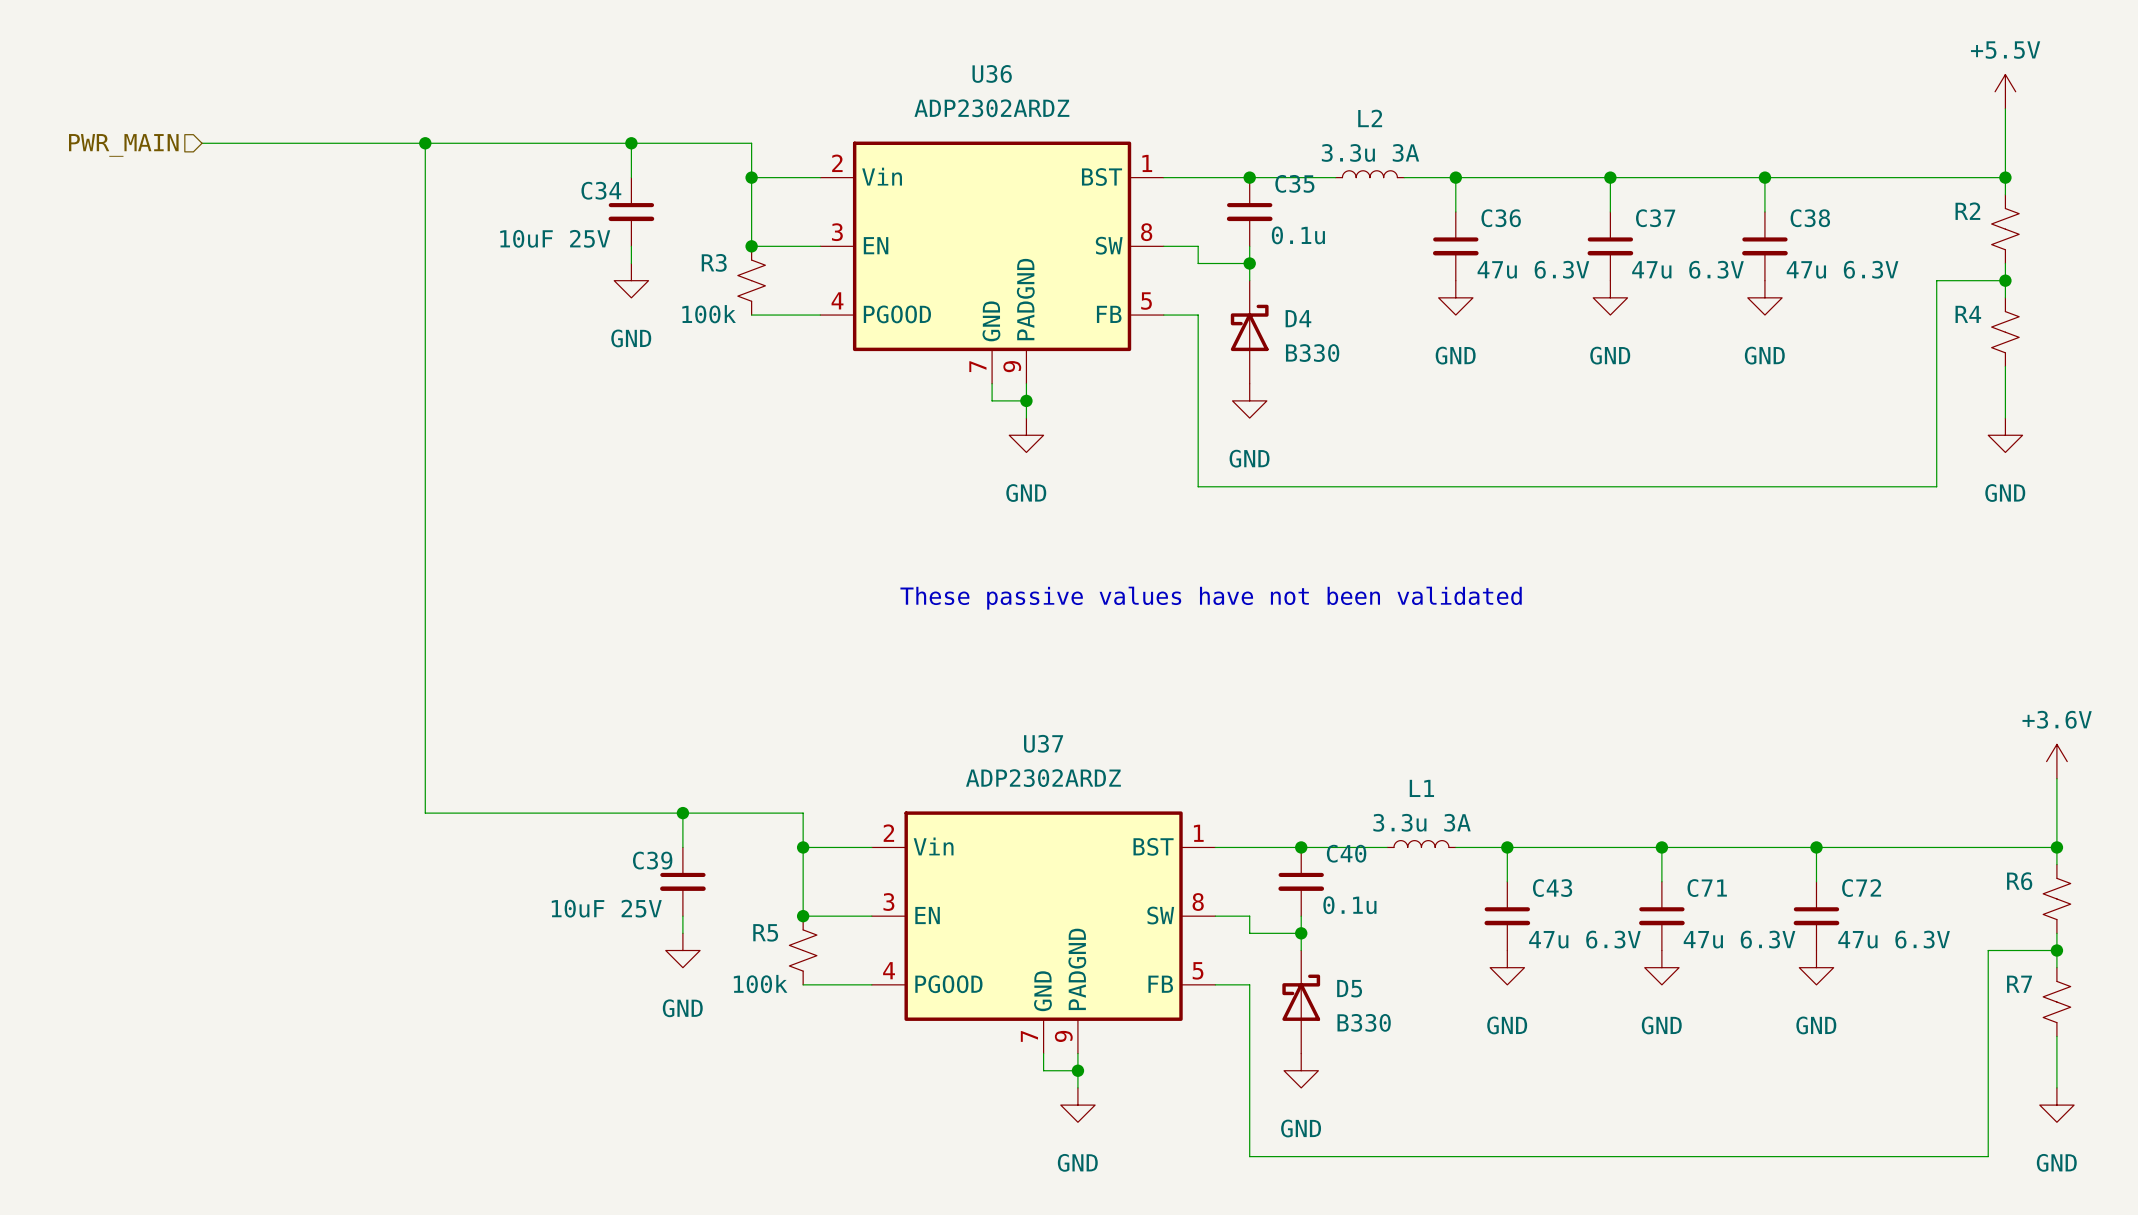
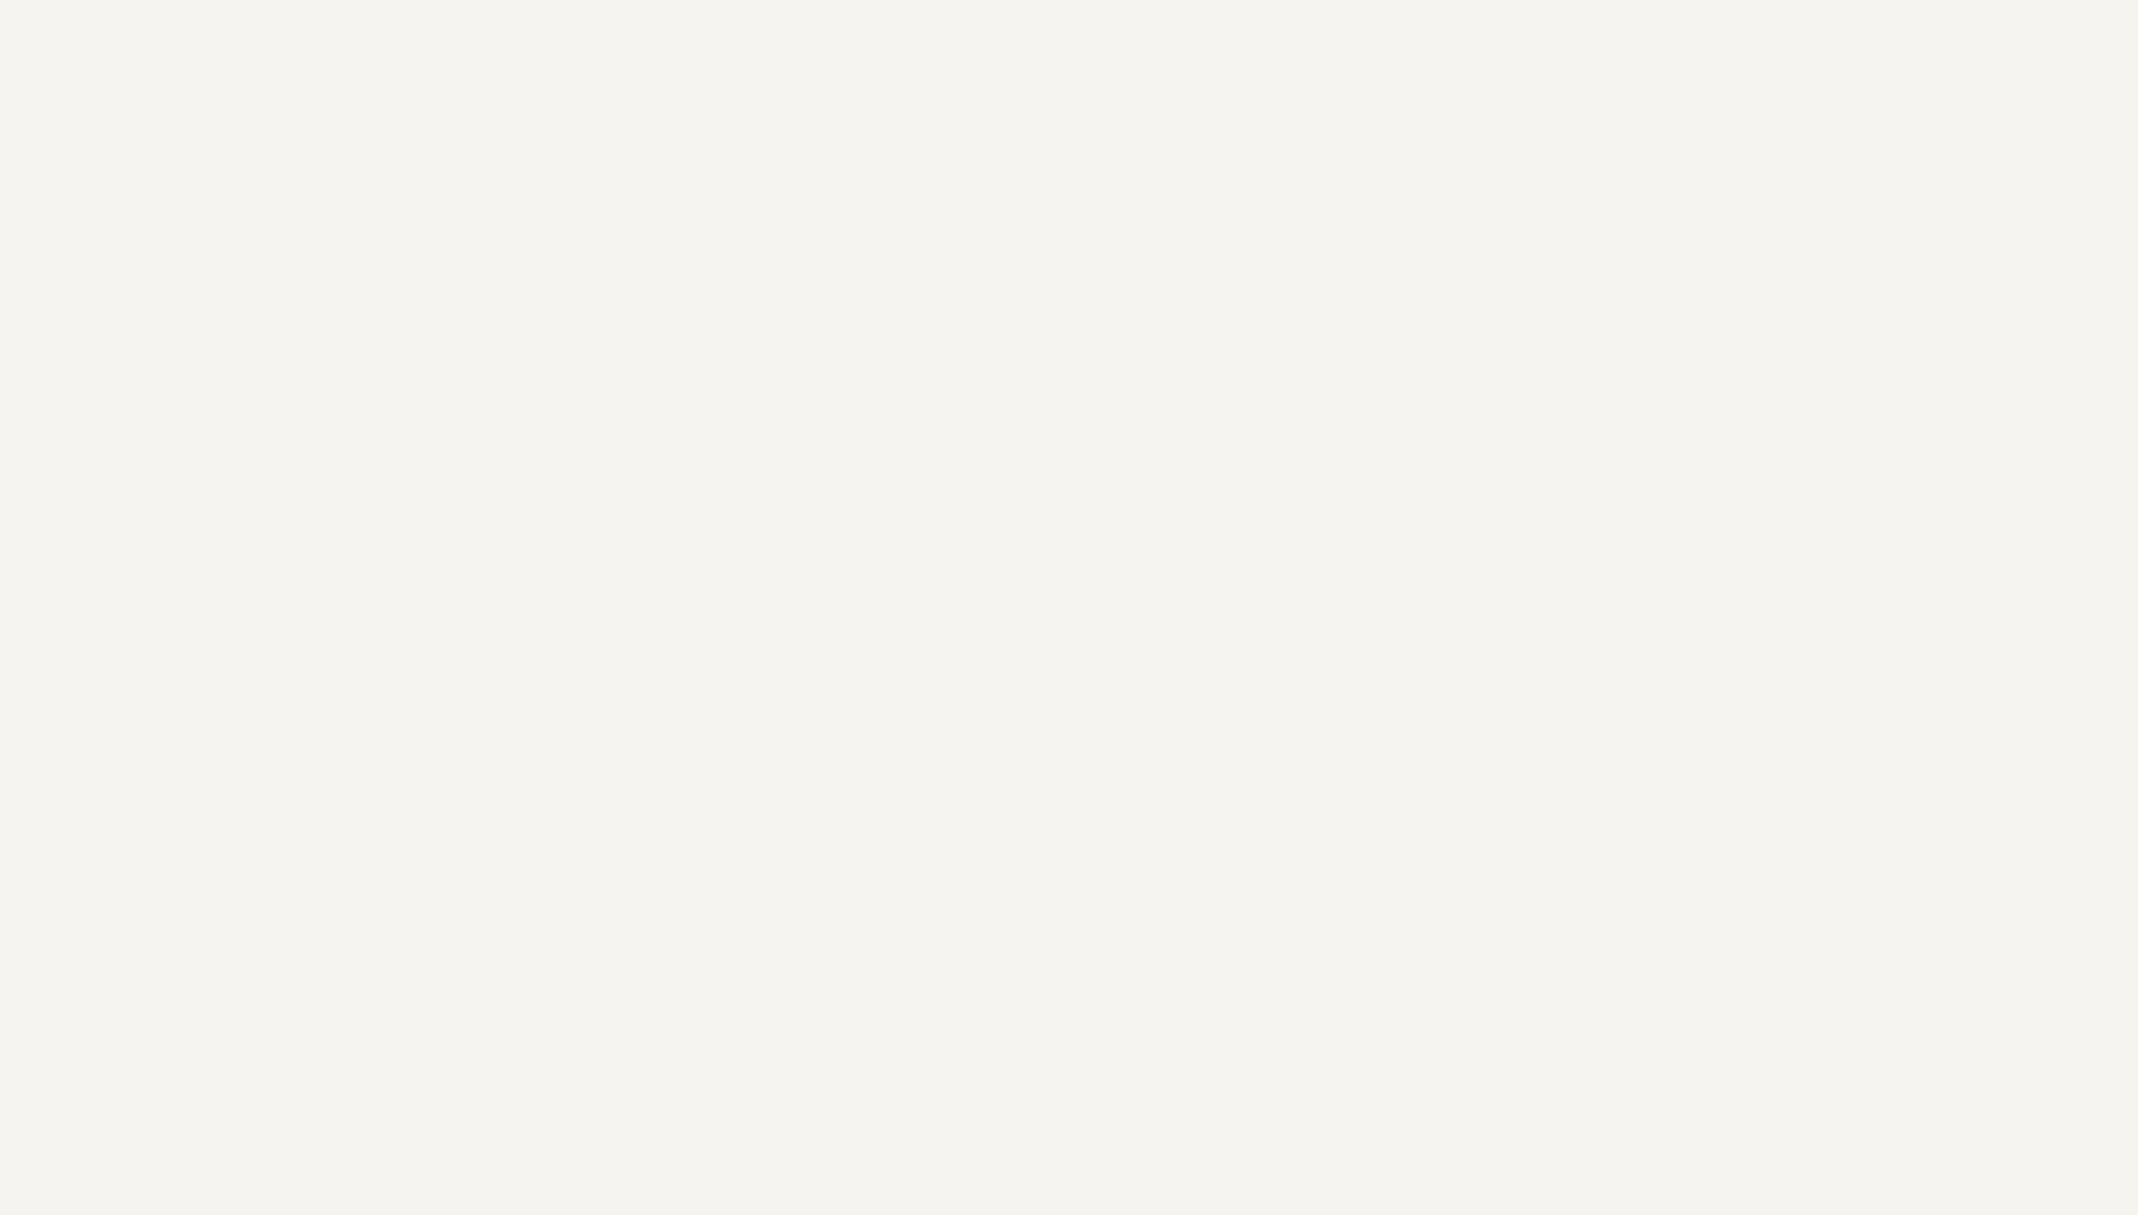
power symbol: +5.5V (2005, 91) -> none
wire: (2005, 108) (2005, 194) -> none
wire: (202, 143) (751, 143) (751, 246) (820, 246) -> none
wire: (425, 143) (425, 813) (803, 813) (803, 916) (871, 916) -> none
junction: (425, 143) -> none
wire: (631, 143) (631, 177) -> none
junction: (631, 143) -> none
hierarchical label: PWR_MAIN (123, 145) -> none
L2: 3.3u 3A (1369, 174) -> none
wire: (751, 177) (820, 177) -> none
junction: (751, 177) -> none
wire: (1163, 177) (1335, 177) -> none
junction: (1249, 177) -> none
wire: (1404, 177) (2005, 177) -> none
wire: (1455, 177) (1455, 211) -> none
junction: (1455, 177) -> none
wire: (1610, 177) (1610, 211) -> none
junction: (1610, 177) -> none
wire: (1764, 177) (1764, 211) -> none
junction: (1764, 177) -> none
junction: (2005, 177) -> none
C34: 10uF 25V (631, 211) -> none
C35: 0.1u (1249, 211) -> none
R2: (2005, 229) -> none
wire: (631, 246) (631, 263) -> none
junction: (751, 246) -> none
wire: (1163, 246) (1198, 246) (1198, 263) (1249, 263) -> none
wire: (1249, 246) (1249, 280) -> none
C36: 47u 6.3V (1455, 246) -> none
C37: 47u 6.3V (1610, 246) -> none
C38: 47u 6.3V (1764, 246) -> none
U36: ADP2302ARDZ (992, 262) -> none
junction: (1249, 263) -> none
wire: (2005, 263) (2005, 297) -> none
power symbol: GND (631, 280) -> none
R3: 100k (751, 280) -> none
wire: (2005, 280) (1936, 280) (1936, 486) (1198, 486) (1198, 315) (1163, 315) -> none
junction: (2005, 280) -> none
power symbol: GND (1455, 297) -> none
power symbol: GND (1610, 297) -> none
power symbol: GND (1764, 297) -> none
wire: (751, 315) (820, 315) -> none
D4: B330 (1249, 332) -> none
R4: (2005, 332) -> none
wire: (2005, 366) (2005, 418) -> none
wire: (992, 383) (992, 400) (1026, 400) -> none
wire: (1026, 383) (1026, 418) -> none
junction: (1026, 400) -> none
power symbol: GND (1249, 400) -> none
power symbol: GND (1026, 435) -> none
power symbol: GND (2005, 435) -> none
text: These passive values have not been validated (1211, 598) -> none
power symbol: +3.6V (2056, 761) -> none
wire: (2056, 778) (2056, 864) -> none
wire: (682, 813) (682, 847) -> none
junction: (682, 813) -> none
L1: 3.3u 3A (1421, 844) -> none
wire: (803, 847) (871, 847) -> none
junction: (803, 847) -> none
wire: (1215, 847) (1387, 847) -> none
junction: (1301, 847) -> none
wire: (1455, 847) (2056, 847) -> none
wire: (1507, 847) (1507, 881) -> none
junction: (1507, 847) -> none
wire: (1661, 847) (1661, 881) -> none
junction: (1661, 847) -> none
wire: (1816, 847) (1816, 881) -> none
junction: (1816, 847) -> none
junction: (2056, 847) -> none
C39: 10uF 25V (682, 881) -> none
C40: 0.1u (1301, 881) -> none
R6: (2056, 898) -> none
wire: (682, 916) (682, 933) -> none
junction: (803, 916) -> none
wire: (1215, 916) (1249, 916) (1249, 933) (1301, 933) -> none
wire: (1301, 916) (1301, 950) -> none
C43: 47u 6.3V (1507, 916) -> none
C71: 47u 6.3V (1661, 916) -> none
C72: 47u 6.3V (1816, 916) -> none
U37: ADP2302ARDZ (1043, 932) -> none
junction: (1301, 933) -> none
wire: (2056, 933) (2056, 967) -> none
power symbol: GND (682, 950) -> none
R5: 100k (803, 950) -> none
wire: (2056, 950) (1988, 950) (1988, 1156) (1249, 1156) (1249, 984) (1215, 984) -> none
junction: (2056, 950) -> none
power symbol: GND (1507, 967) -> none
power symbol: GND (1661, 967) -> none
power symbol: GND (1816, 967) -> none
wire: (803, 984) (871, 984) -> none
D5: B330 (1301, 1002) -> none
R7: (2056, 1002) -> none
wire: (2056, 1036) (2056, 1087) -> none
wire: (1043, 1053) (1043, 1070) (1077, 1070) -> none
wire: (1077, 1053) (1077, 1087) -> none
junction: (1077, 1070) -> none
power symbol: GND (1301, 1070) -> none
power symbol: GND (1077, 1105) -> none
power symbol: GND (2056, 1105) -> none

